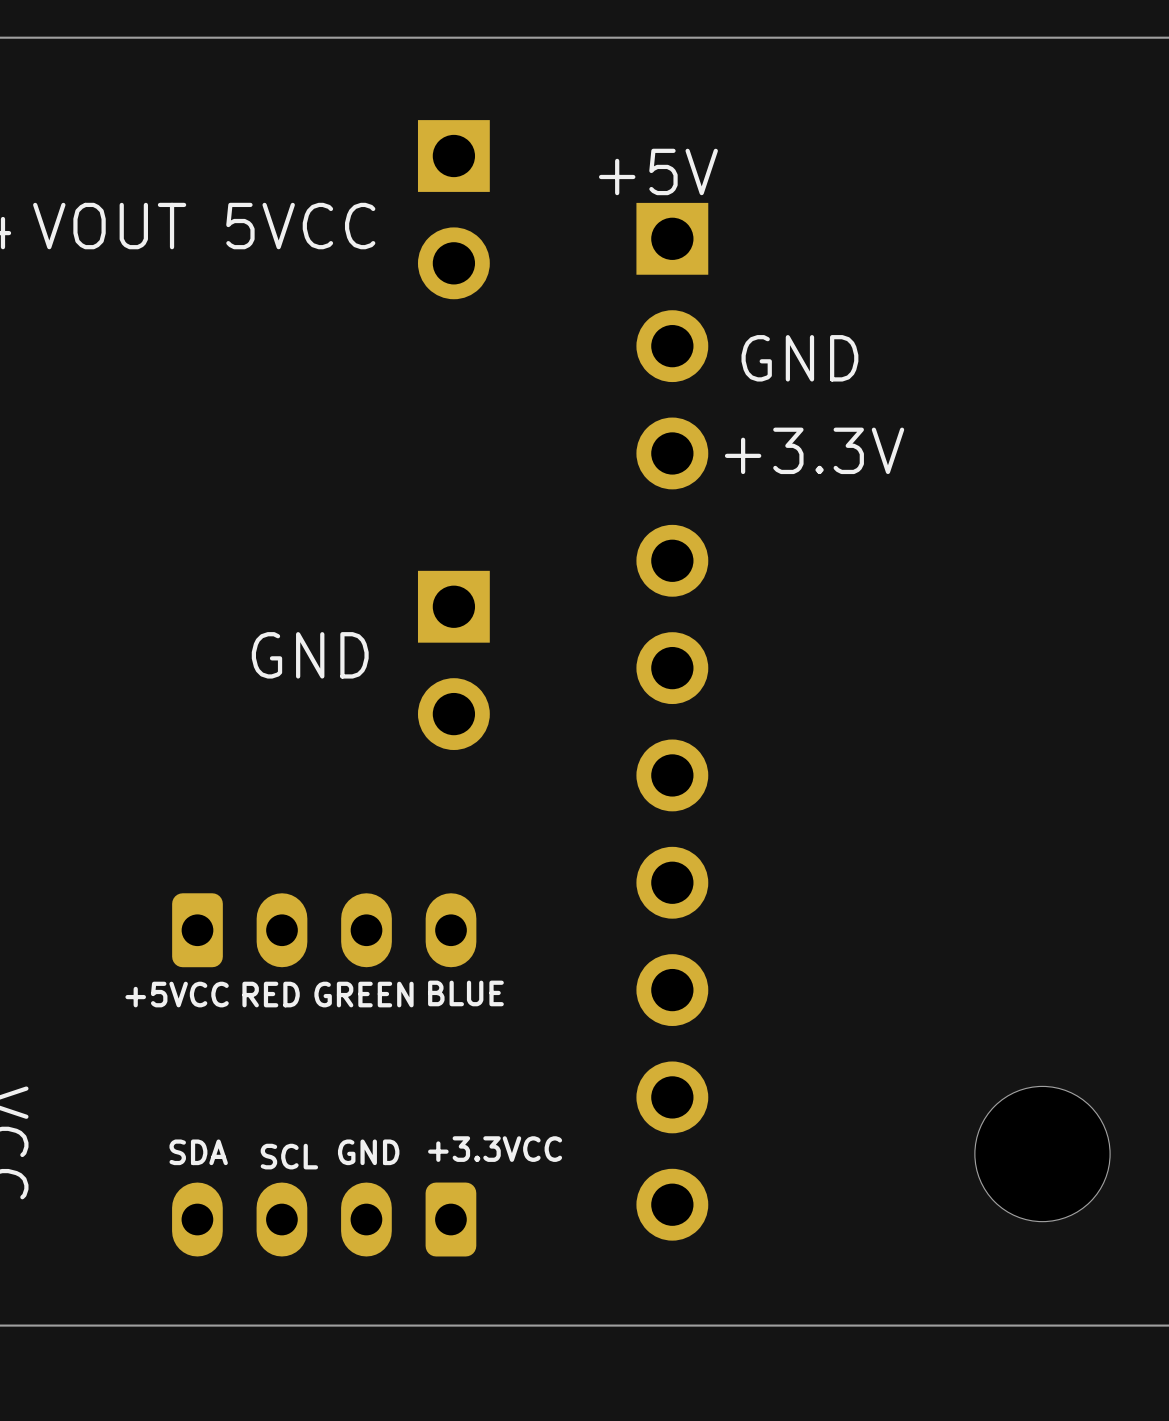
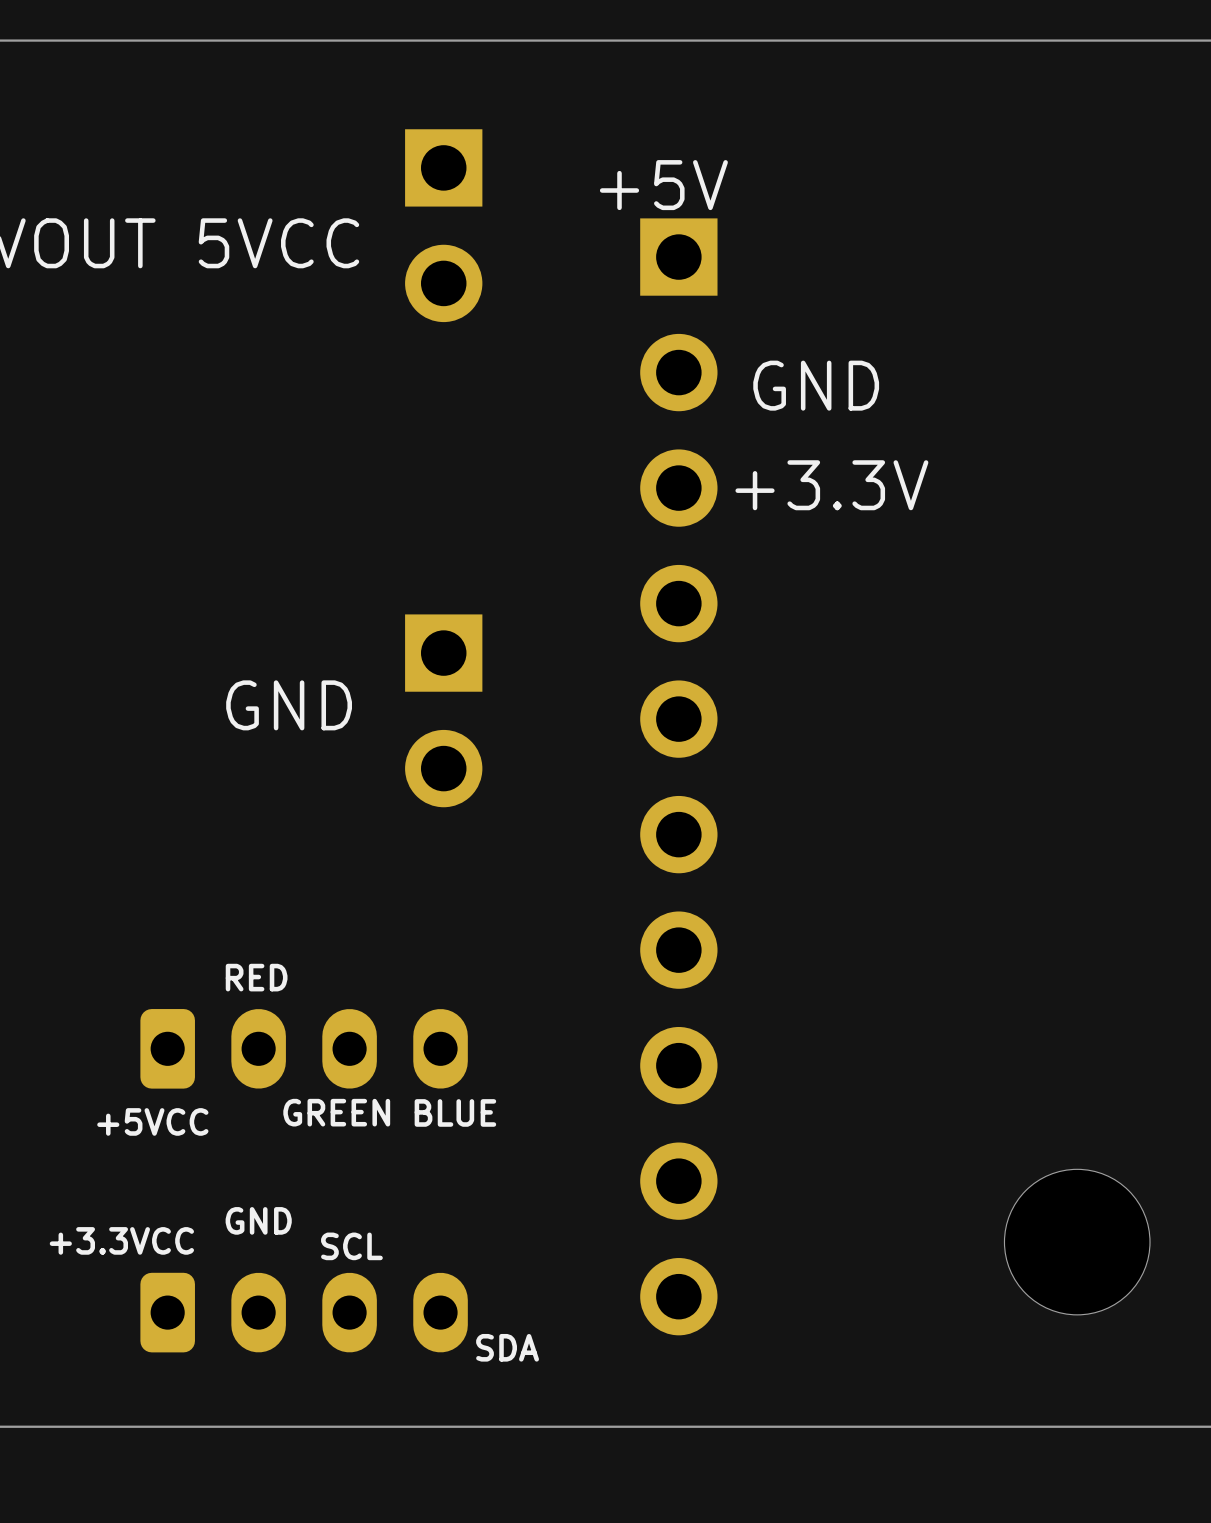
part position: (324, 930) -> (304, 1048)
text position: BLUE (465, 993) -> BLUE (455, 1112)
text position: +5VCC (177, 994) -> +5VCC (152, 1121)
text position: RED (271, 994) -> RED (256, 977)
text position: GREEN (363, 994) -> GREEN (336, 1112)
text position: +3.3VCC (495, 1149) -> +3.3VCC (121, 1240)
text position: SDA (198, 1152) -> SDA (507, 1347)
text: GND (368, 1152) -> SCL (351, 1246)
text: SCL (289, 1156) -> GND (258, 1220)
part rotation: 0° (324, 1219) -> 180° (304, 1312)

